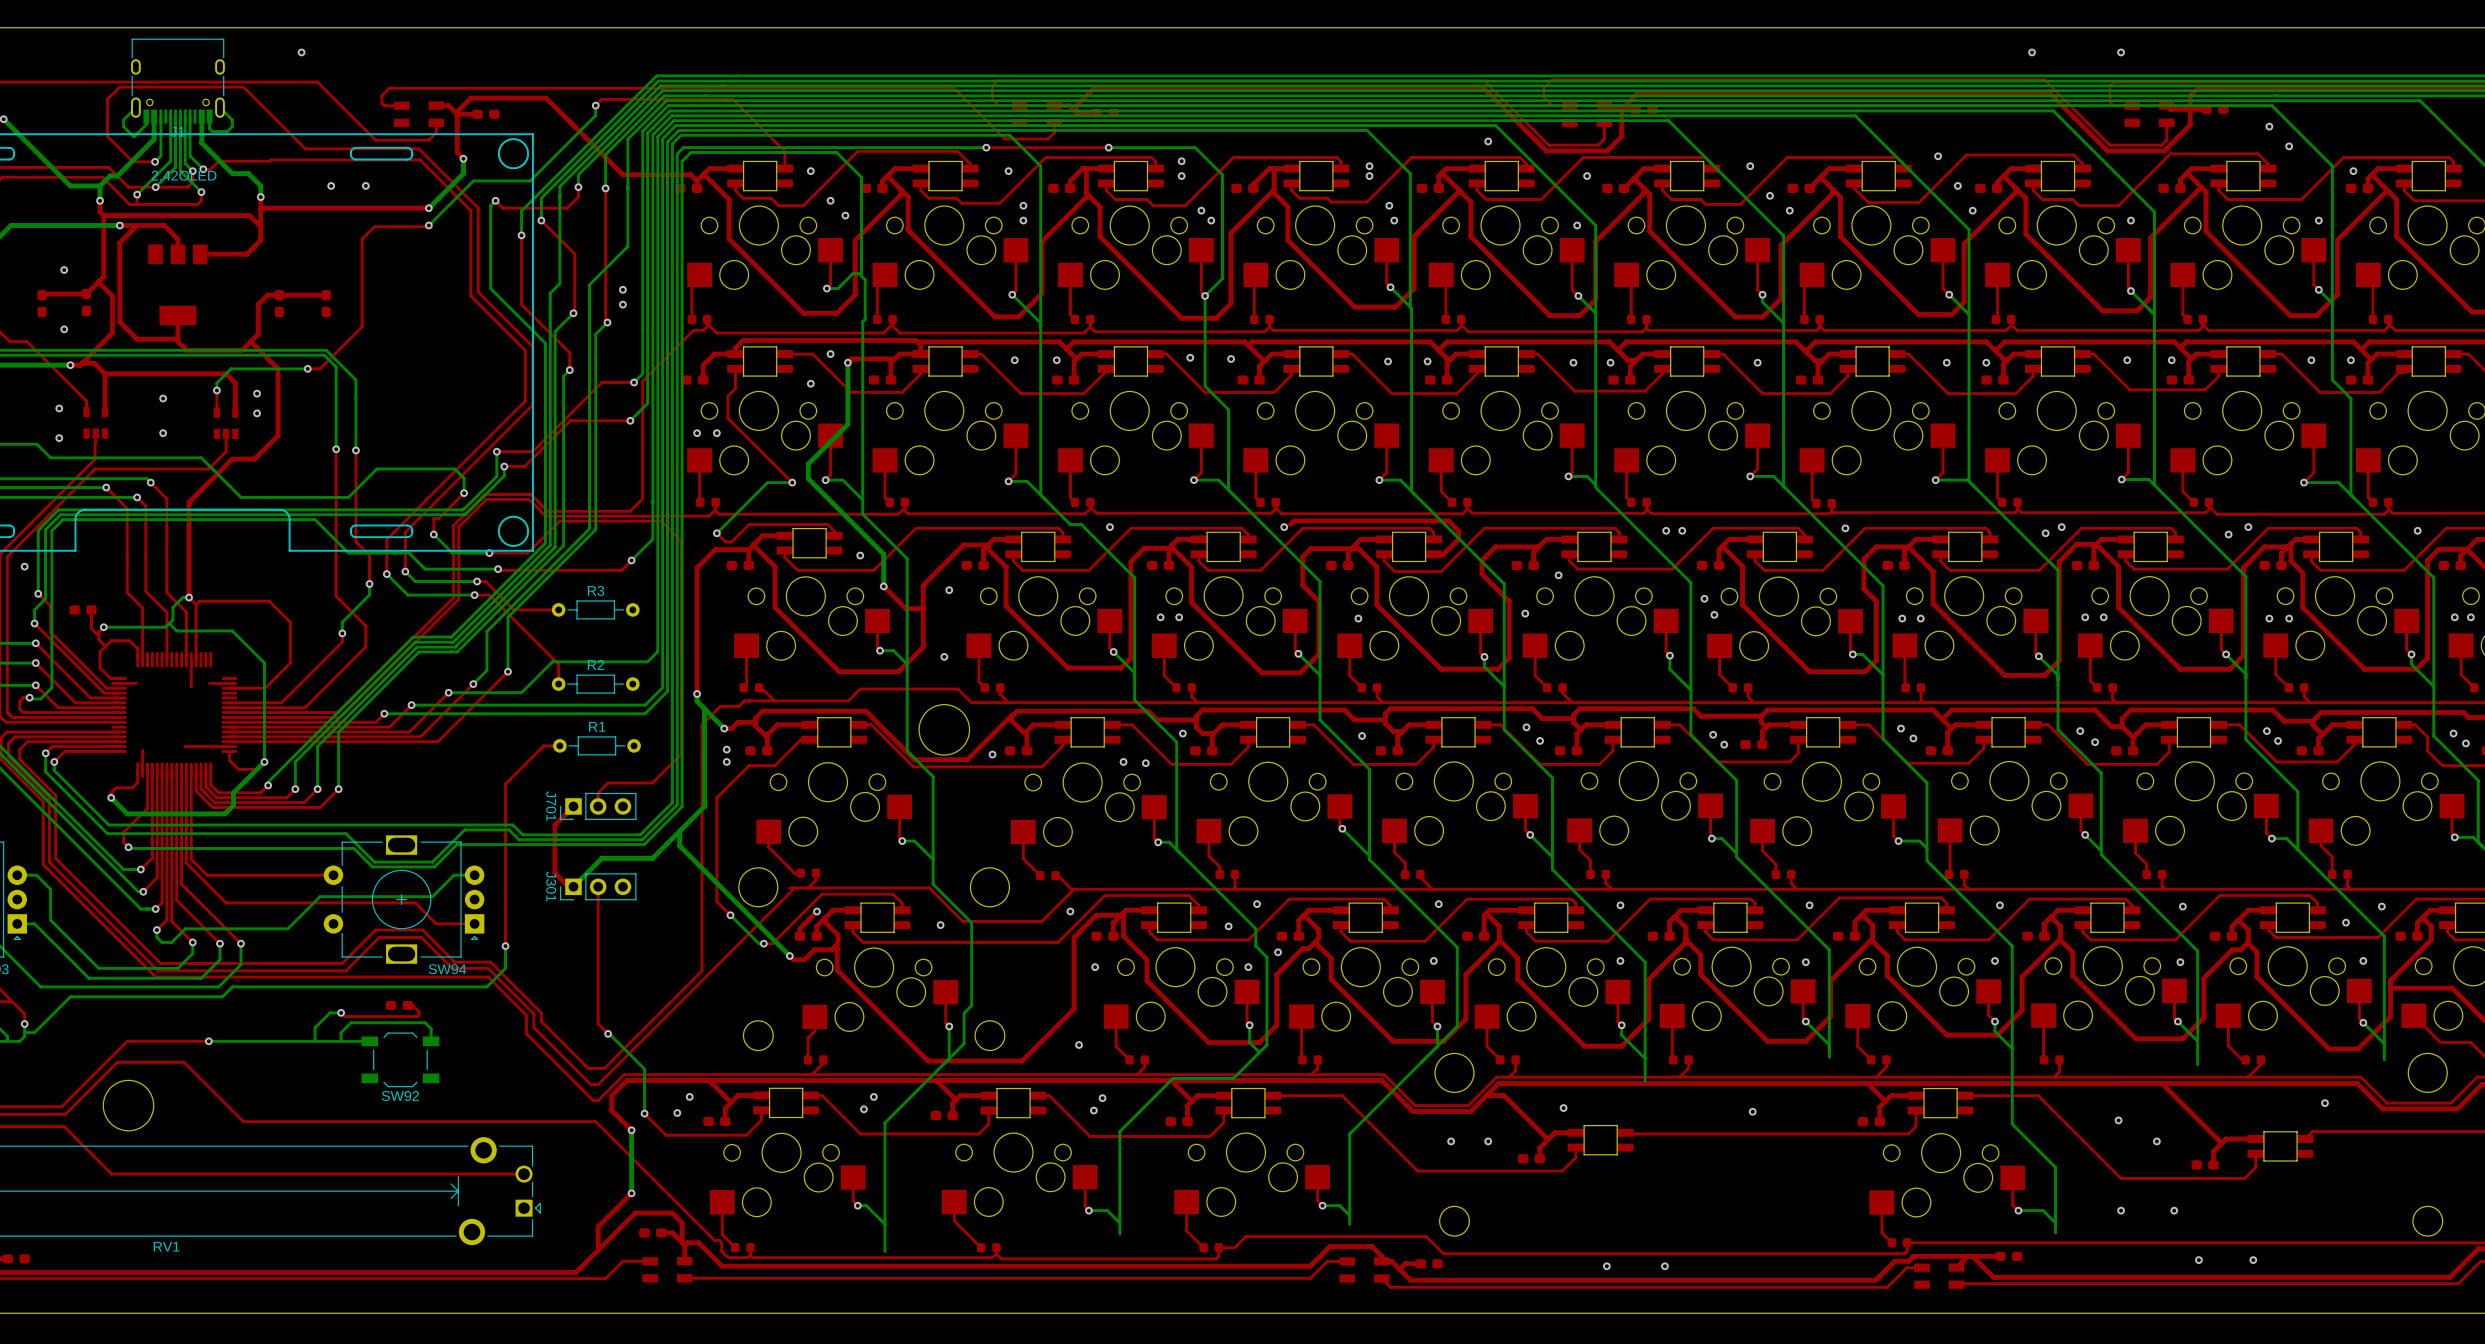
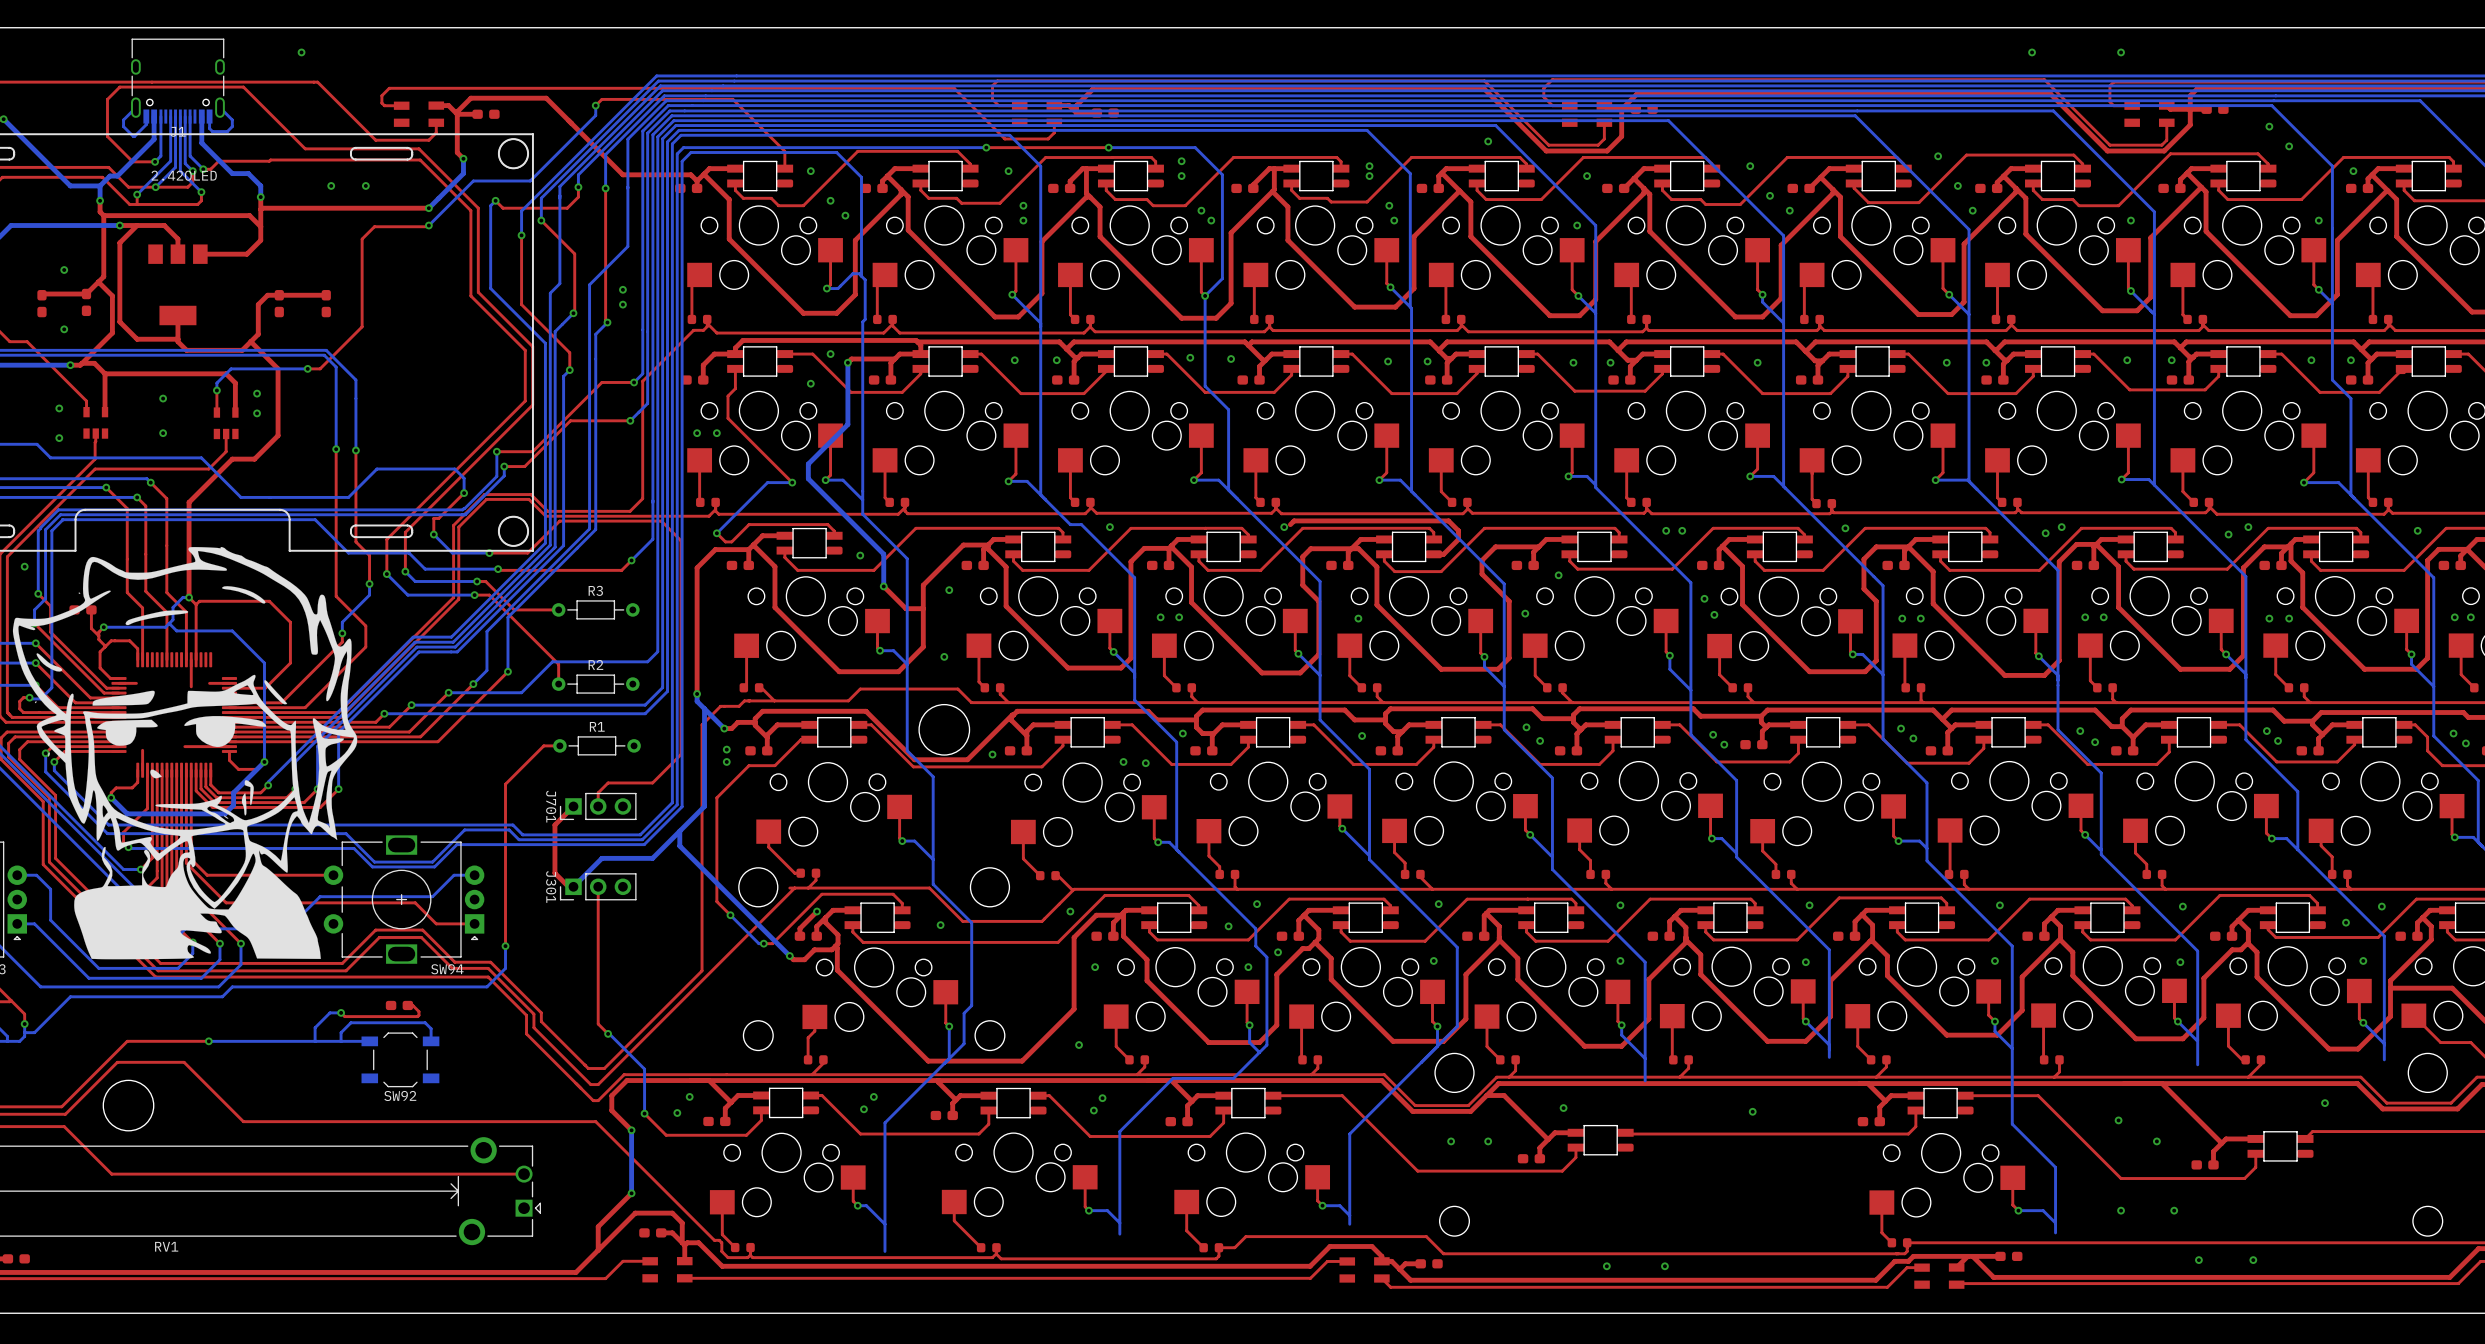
drawing: none -> [12, 546, 358, 960]

